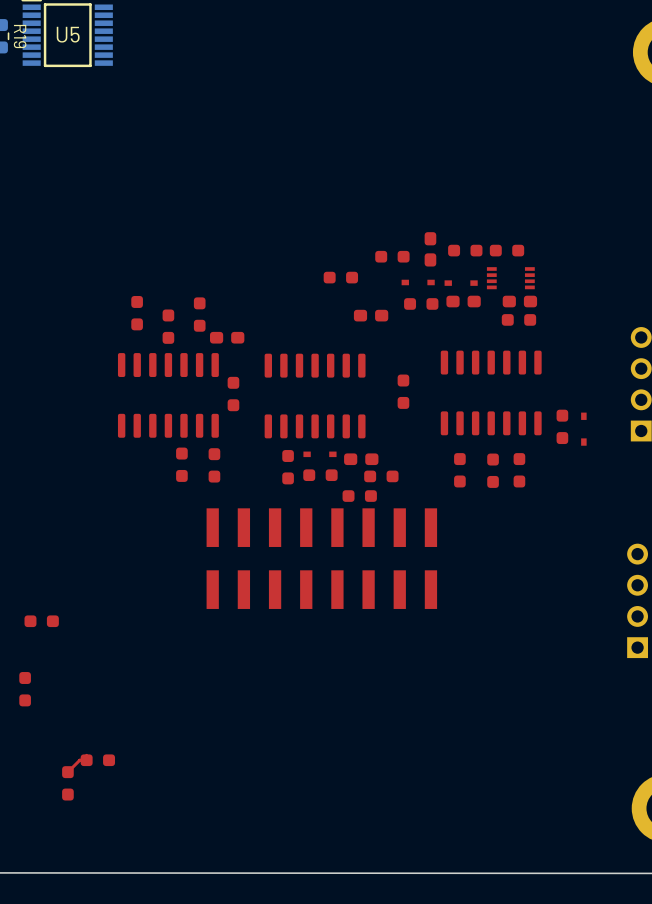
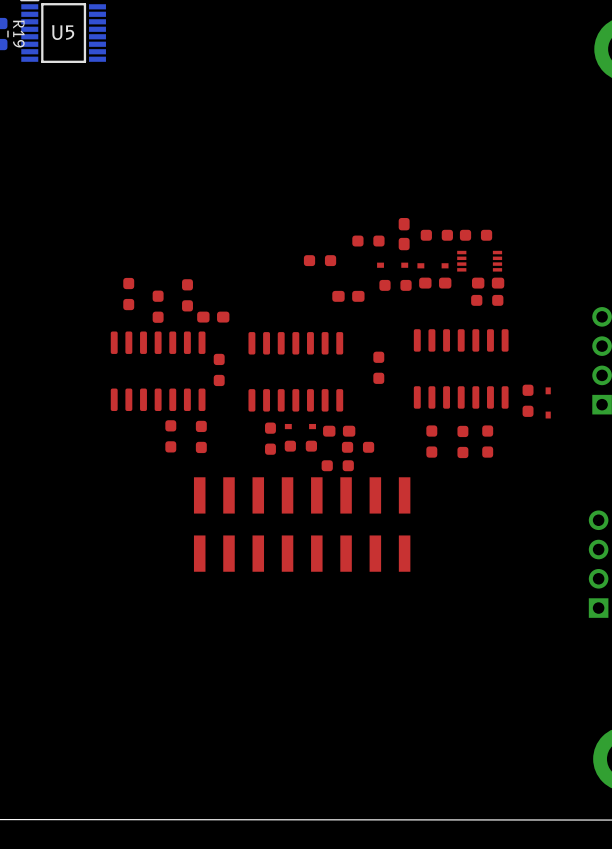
part: (41, 621) -> none
part: (25, 689) -> none
top track: (86, 755) (86, 760) (79, 760) (67, 772) -> none
part: (97, 760) -> none
part: (67, 783) -> none

